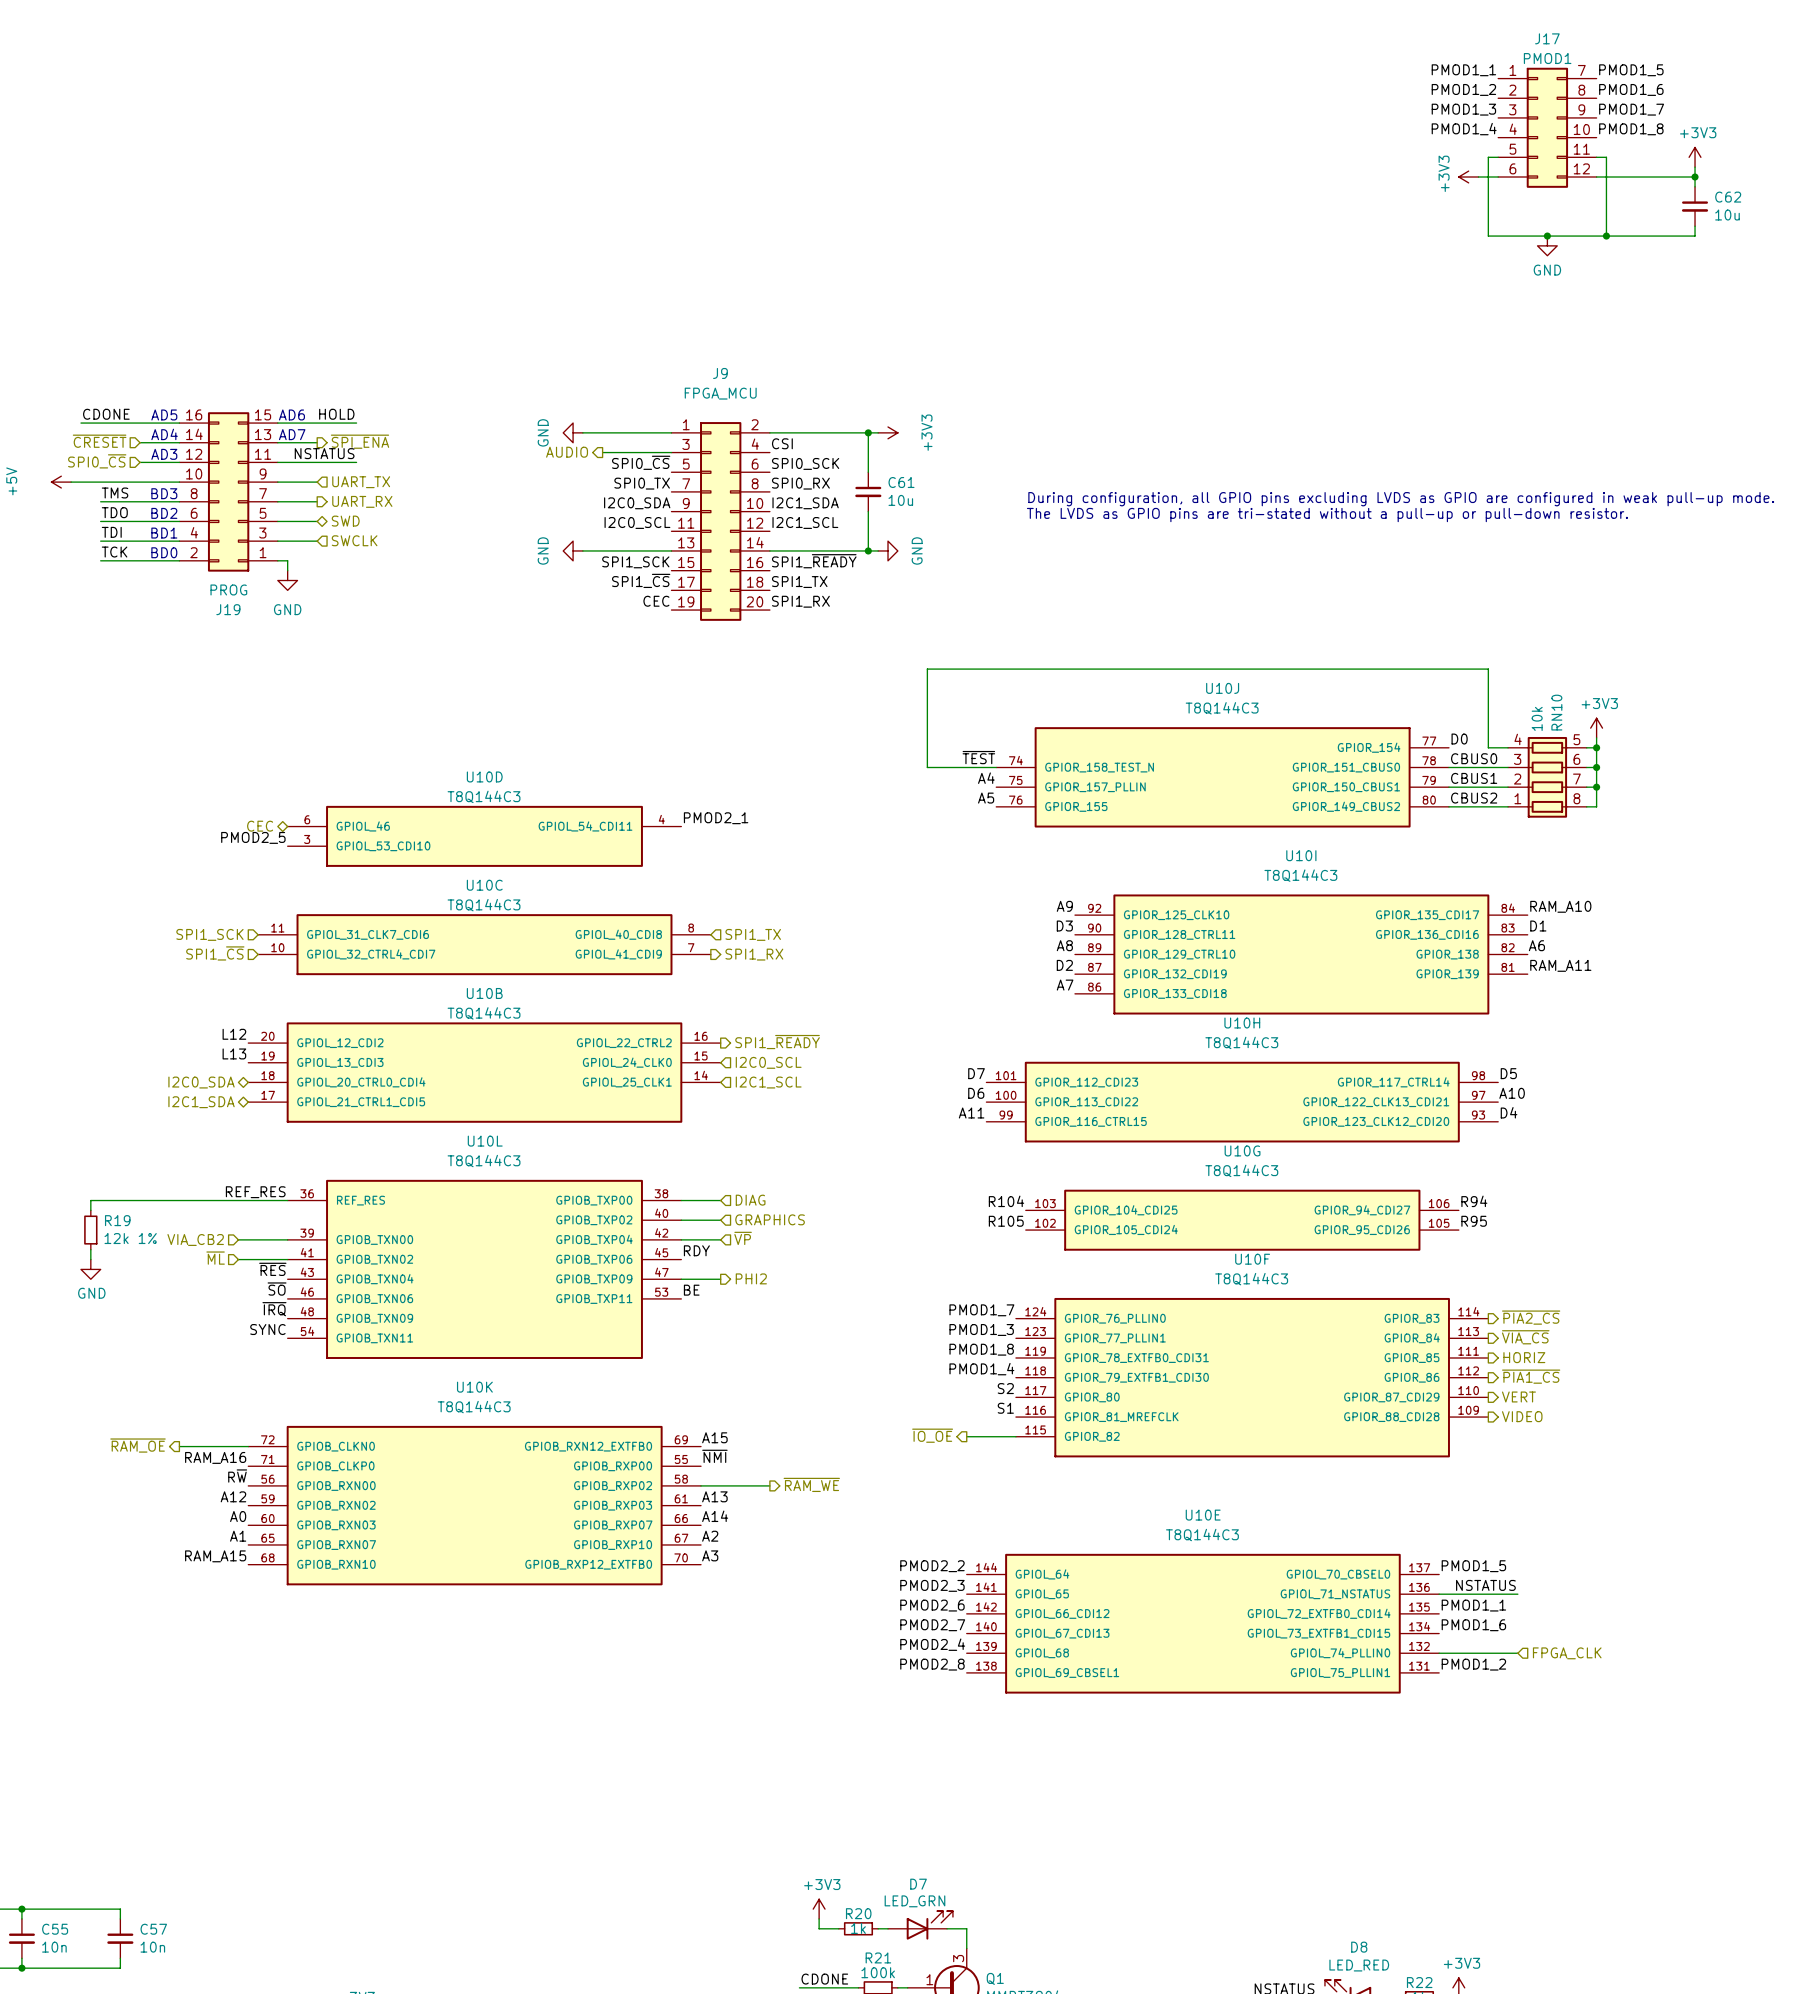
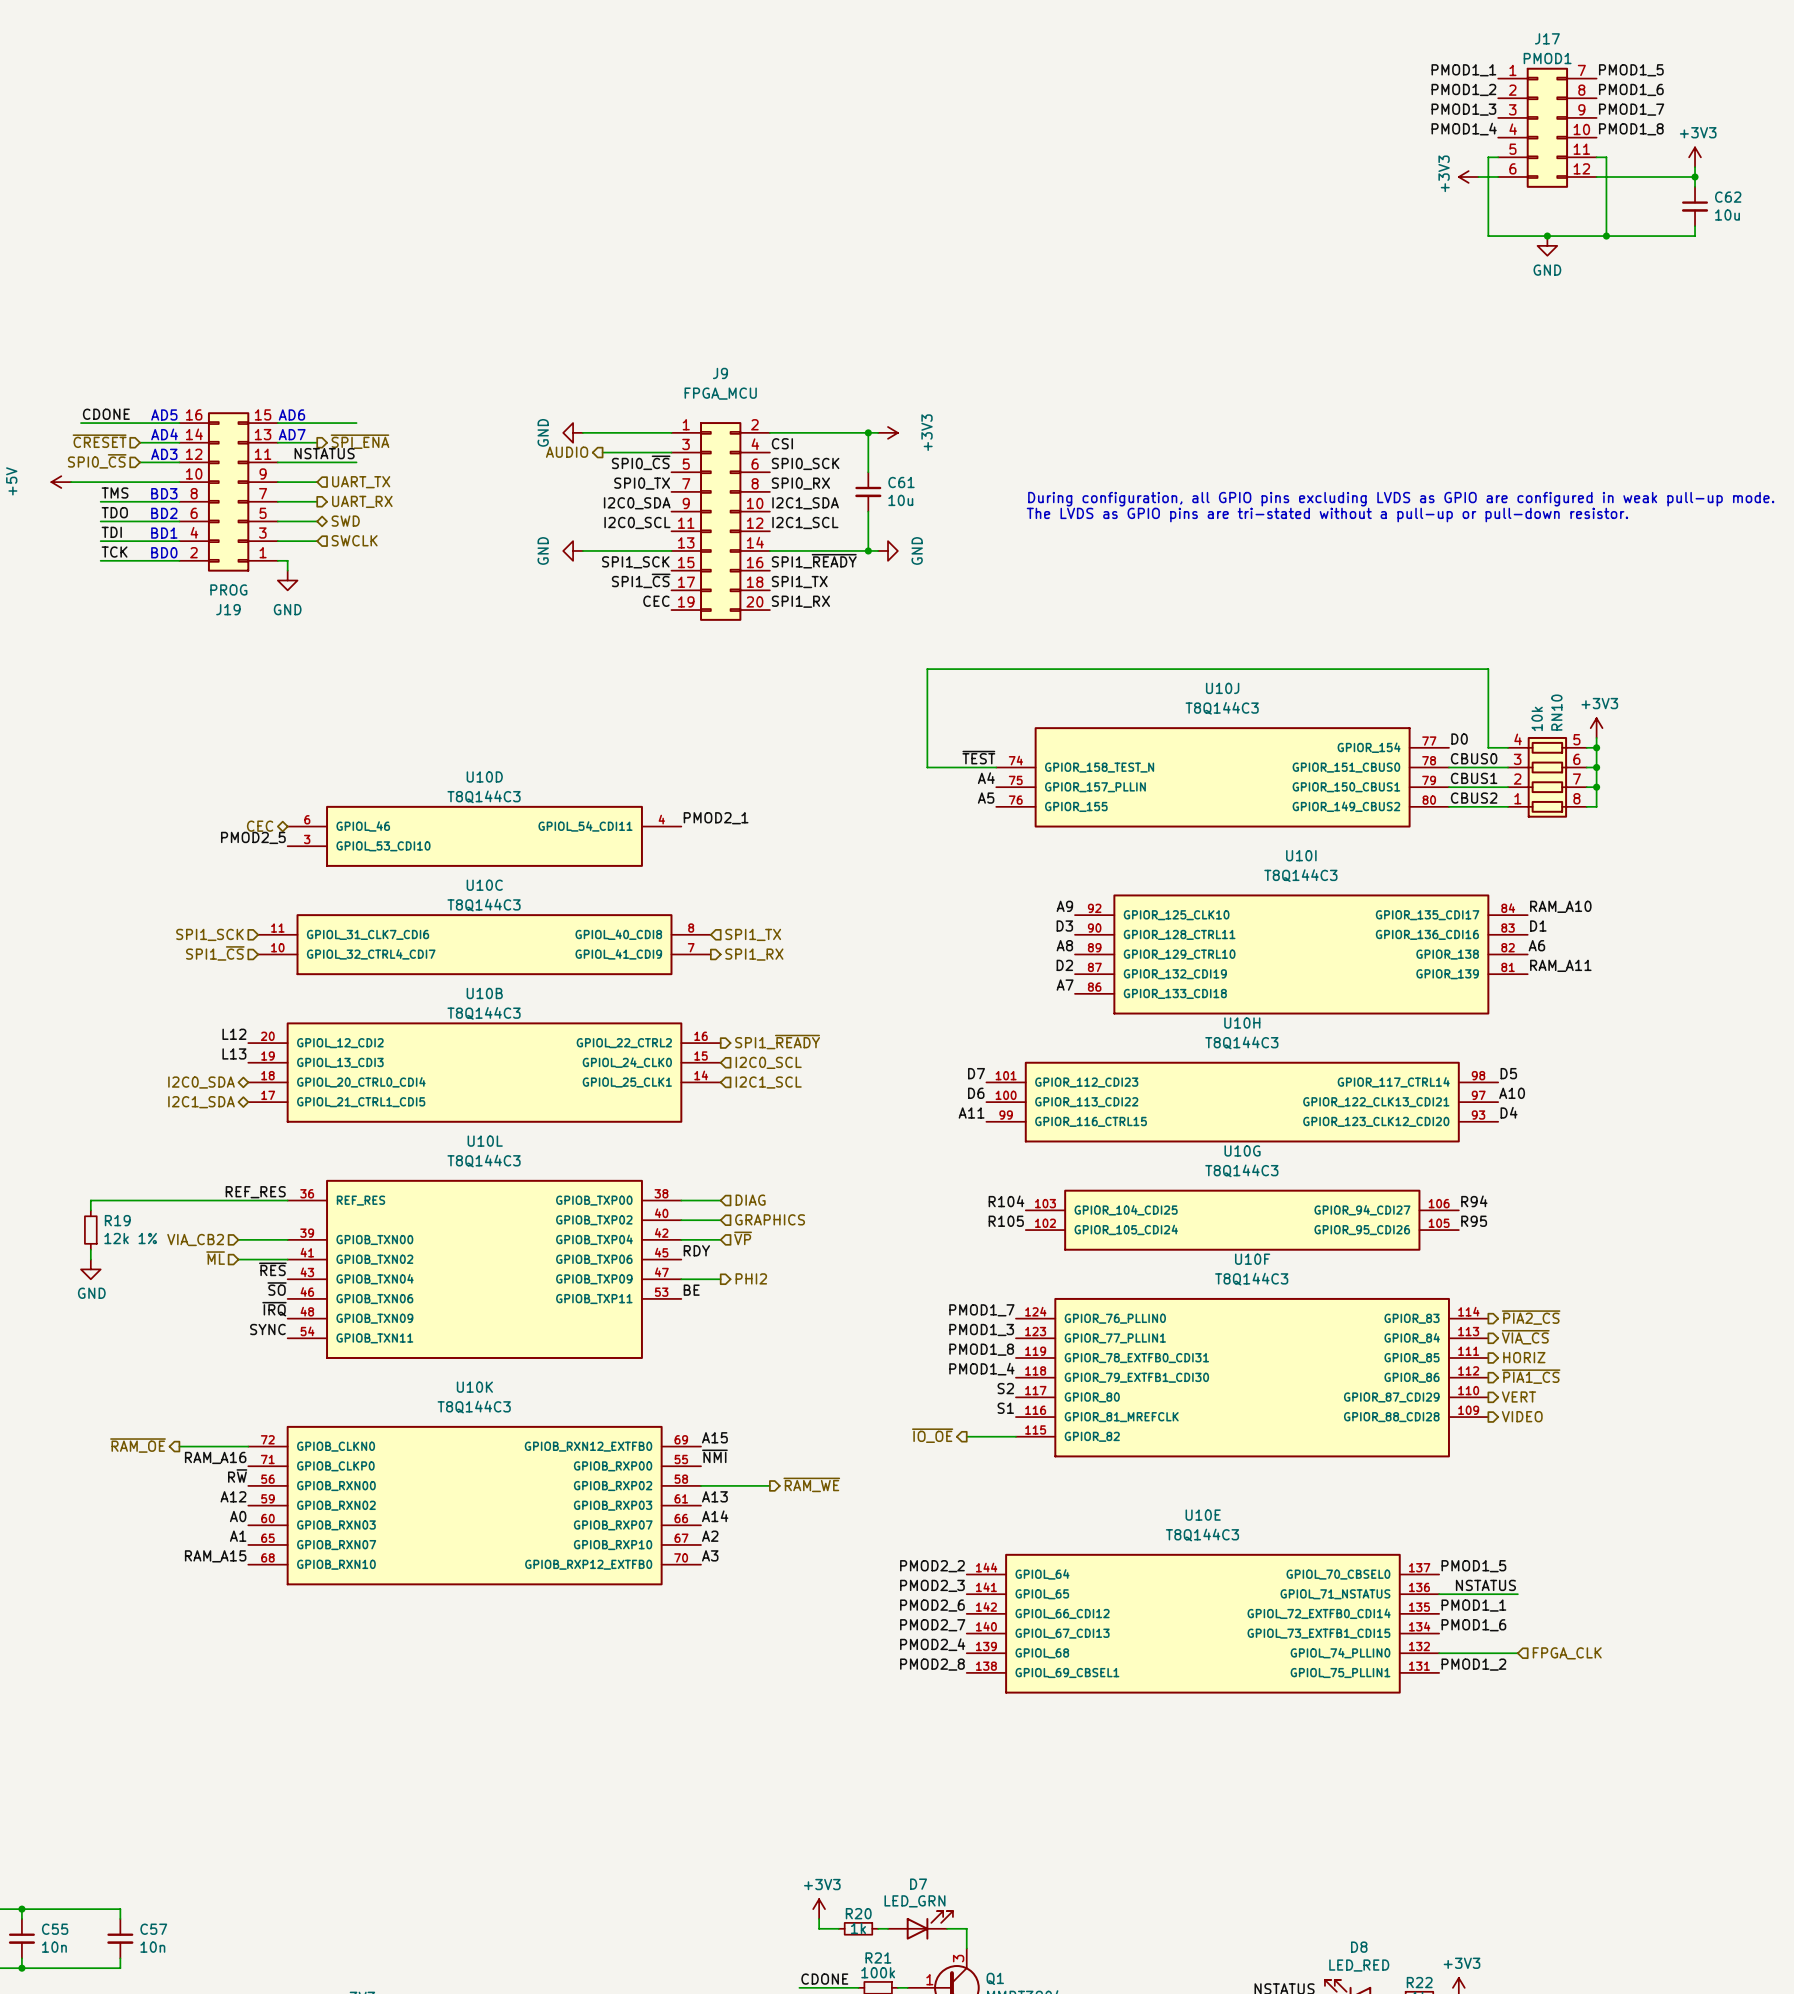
label: HOLD (336, 414) -> none

